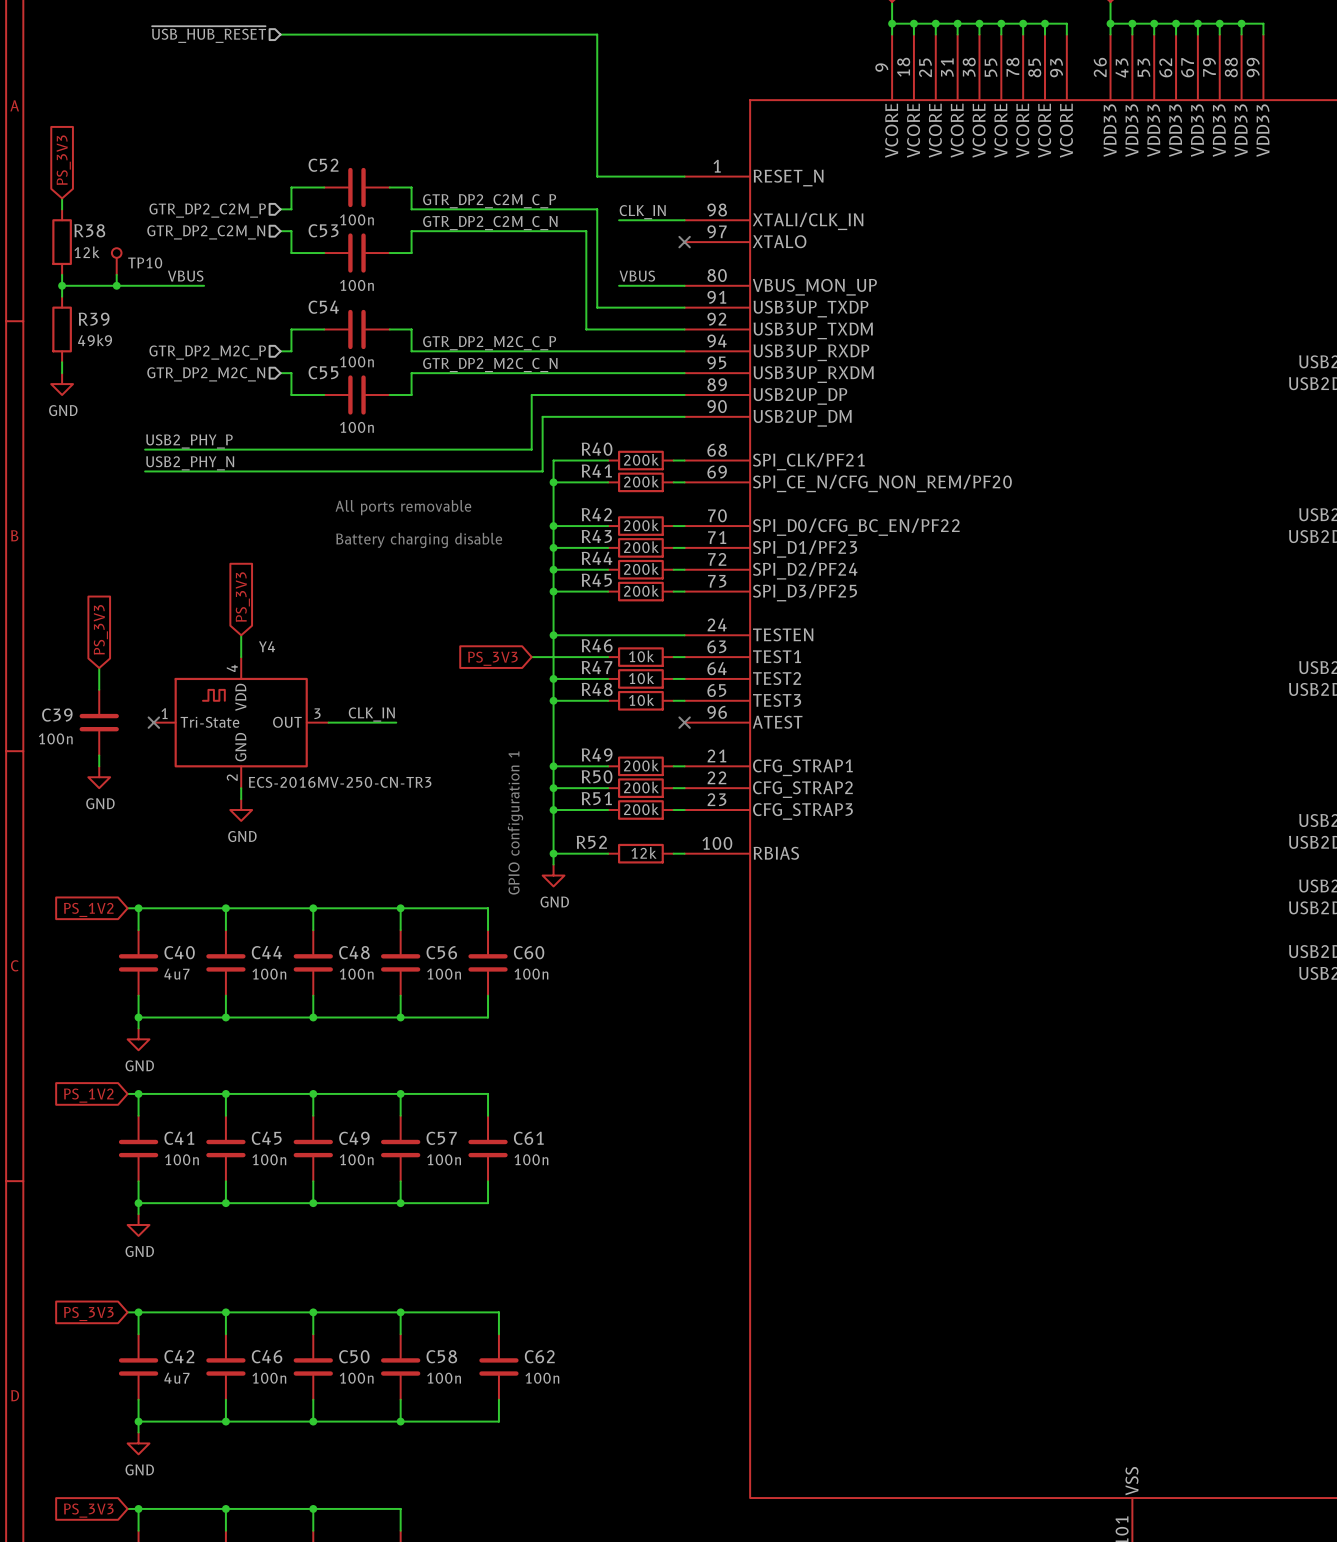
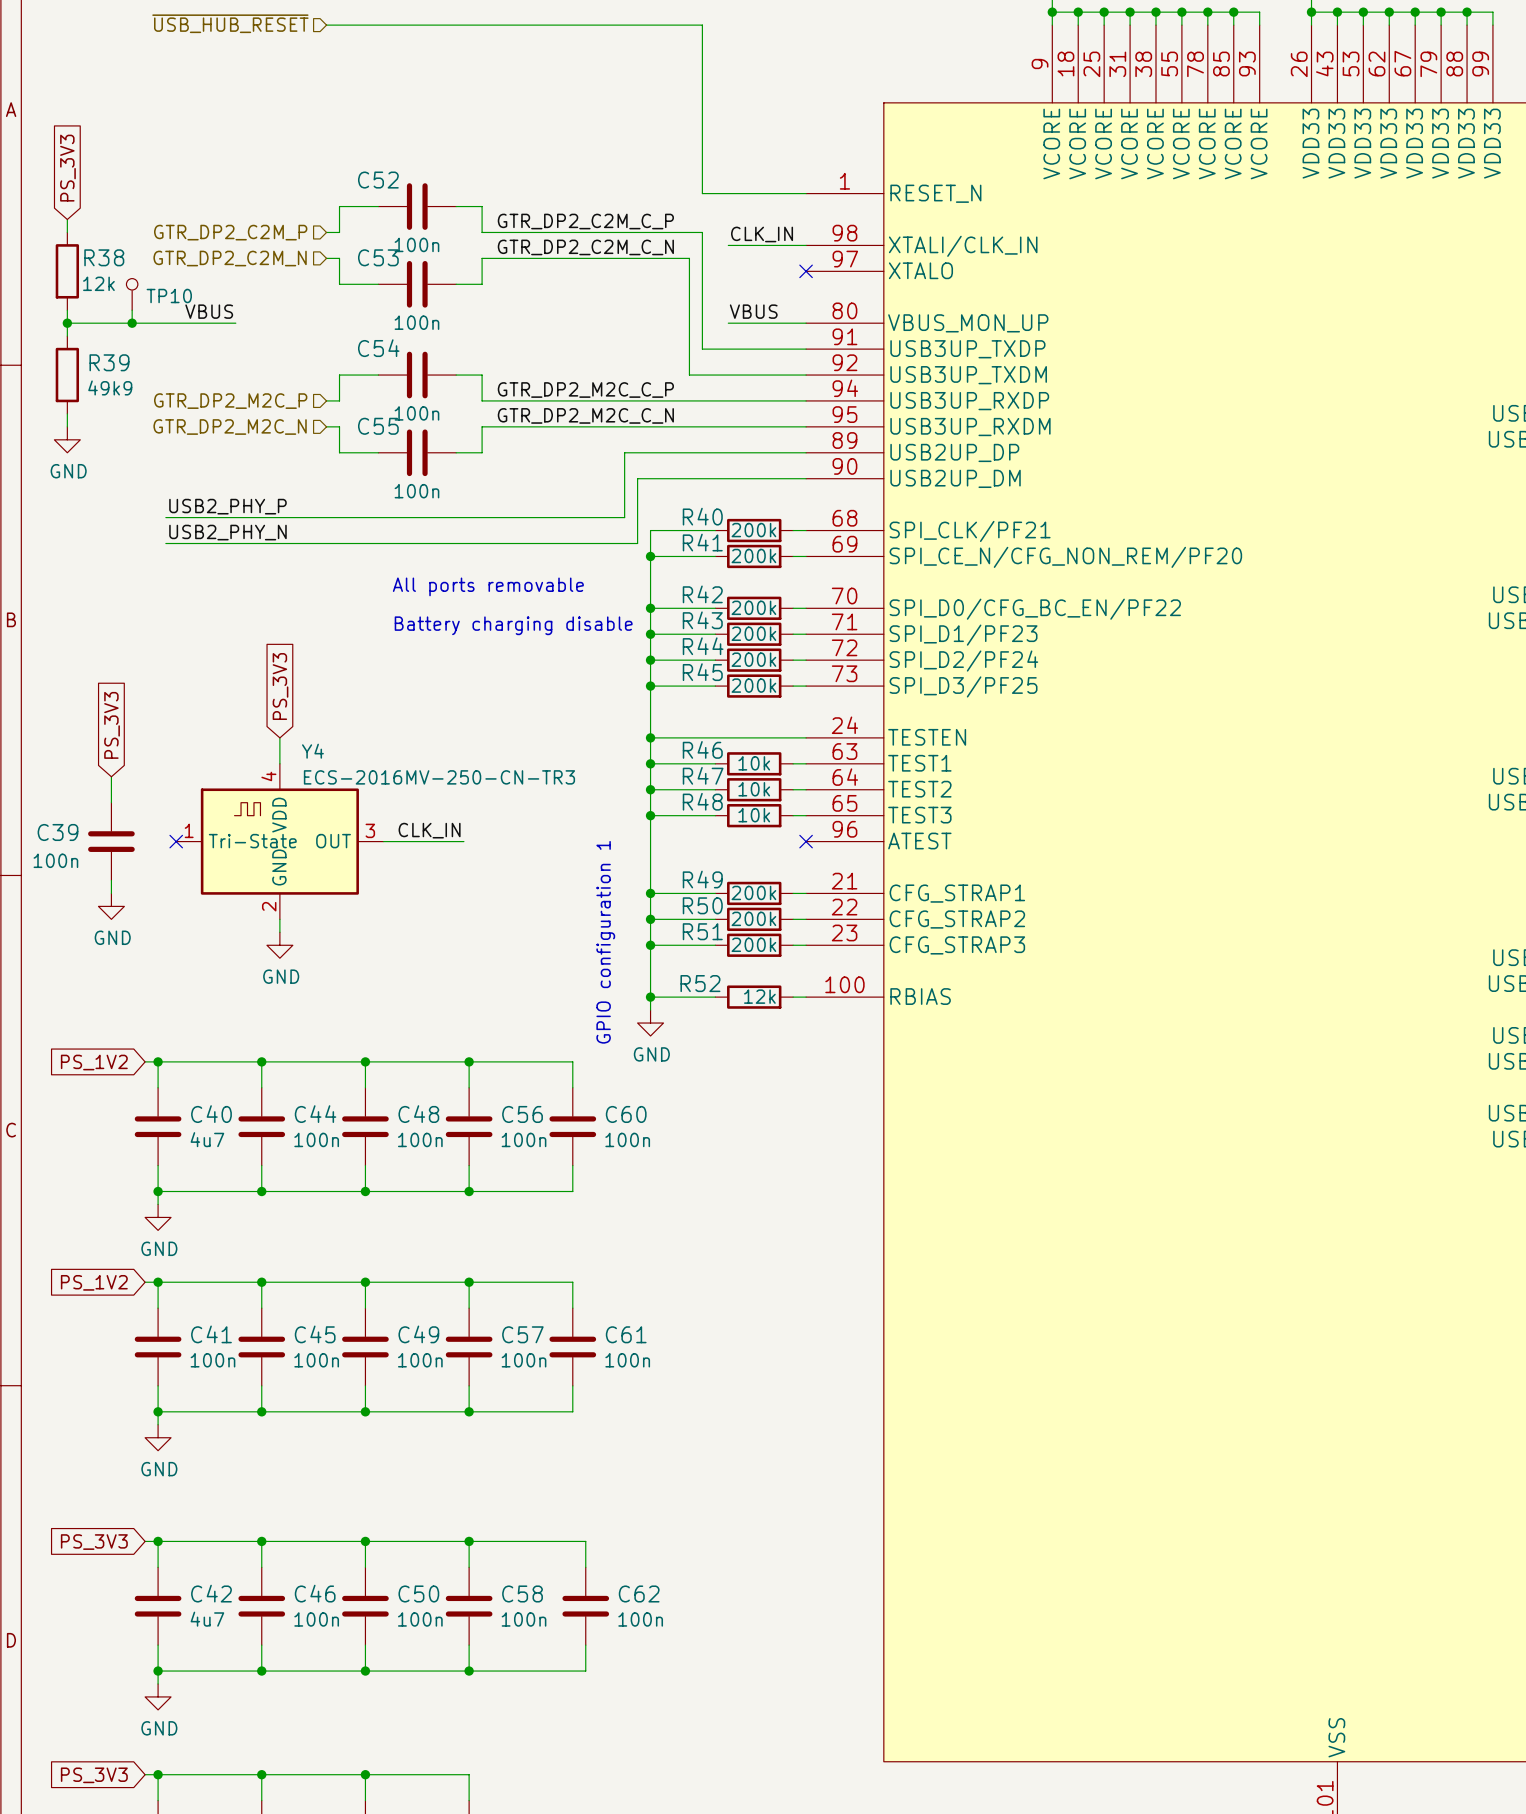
wire: (531, 657) (553, 657) -> none
junction: none -> (650, 763)
global label: PS_3V3 (492, 658) -> none
Y4 value position: ECS-2016MV-250-CN-TR3 (340, 782) -> ECS-2016MV-250-CN-TR3 (439, 777)

